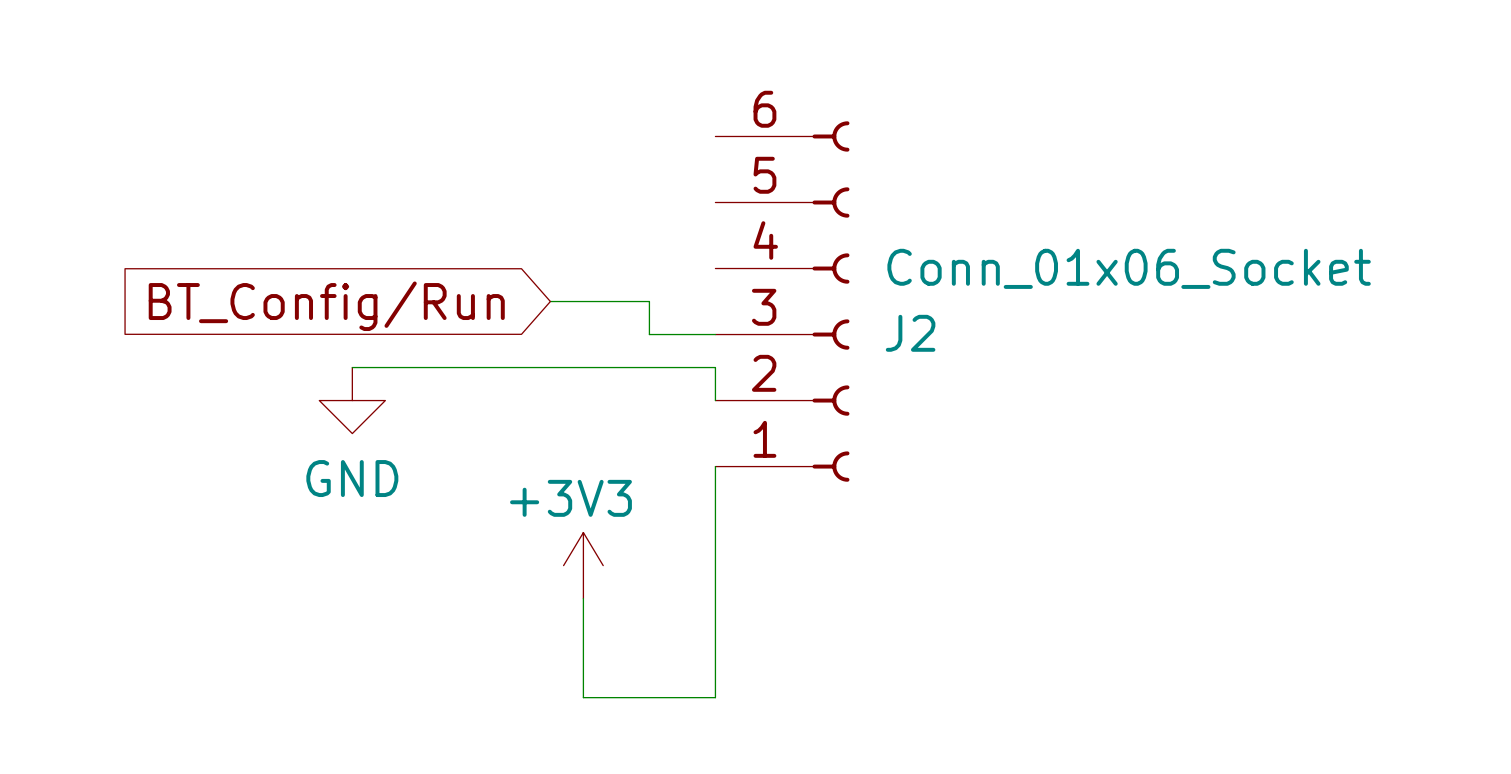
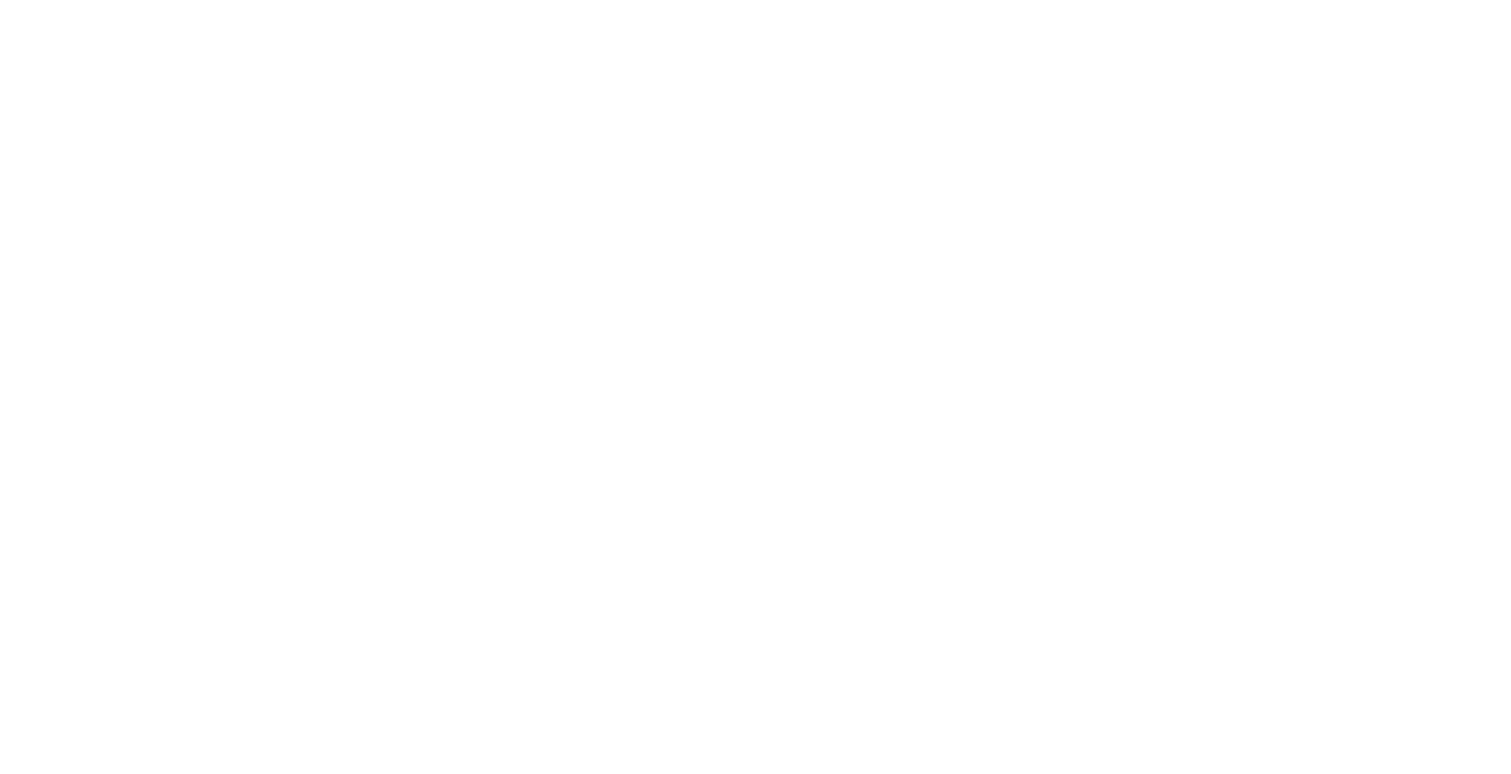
wire: (550, 301) (649, 301) (649, 334) (715, 334) -> none
J2: Conn_01x06_Socket (782, 301) -> none
global label: BT_Config/Run (326, 306) -> none
wire: (352, 367) (715, 367) (715, 400) -> none
power symbol: GND (352, 400) -> none
wire: (715, 466) (715, 697) (583, 697) (583, 598) -> none
power symbol: +3V3 (583, 565) -> none

